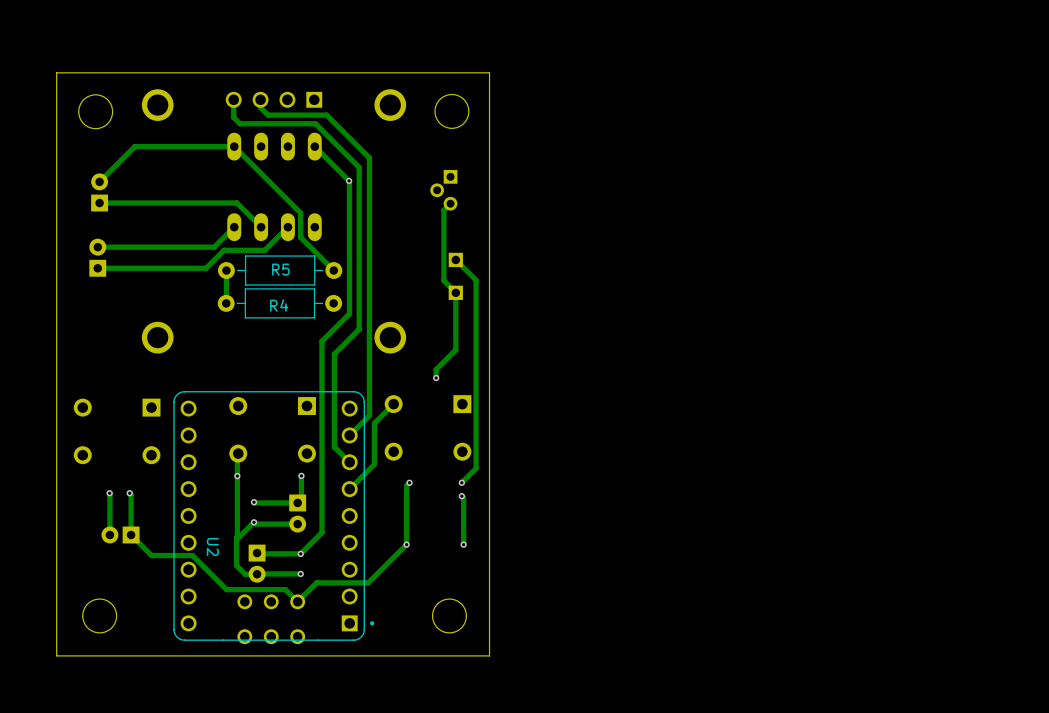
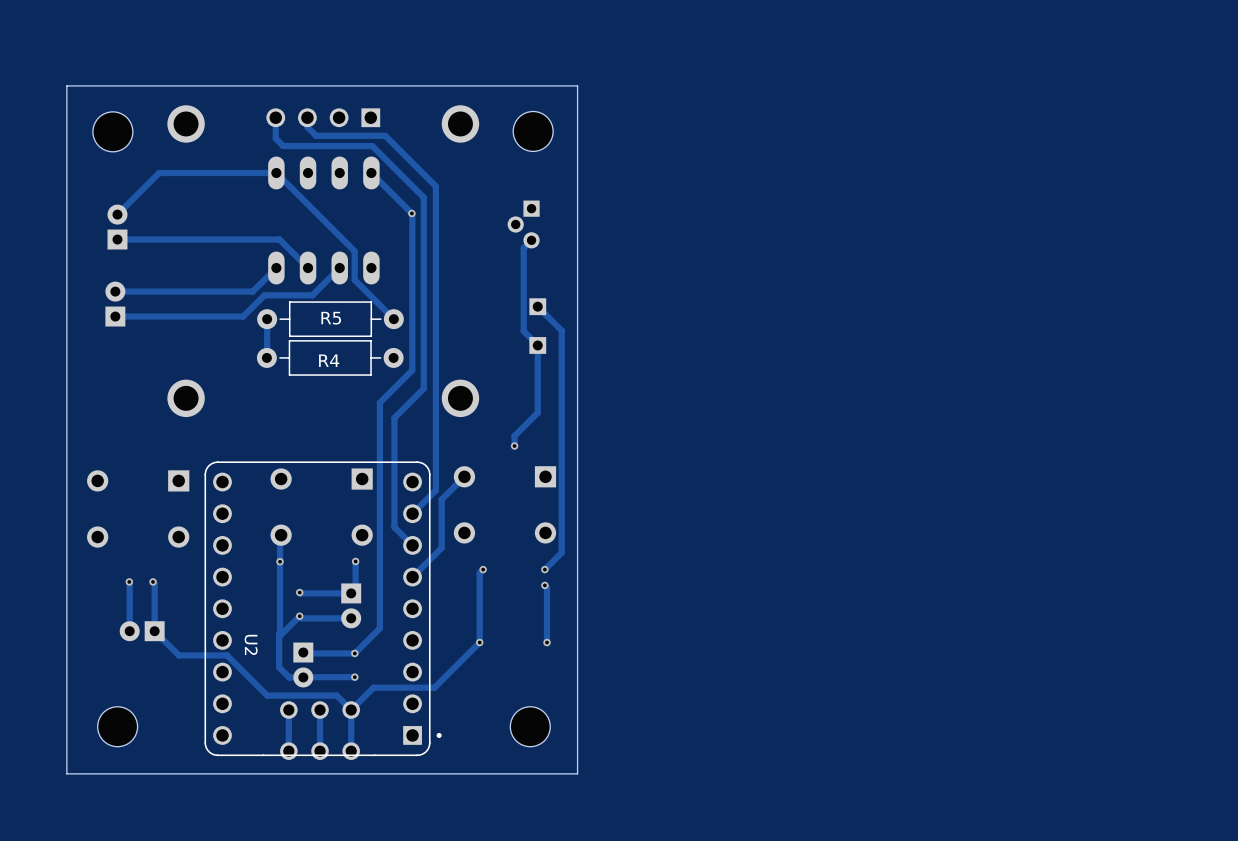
track: none -> (288, 710) (288, 751)
track: none -> (320, 710) (320, 751)
track: none -> (351, 710) (351, 751)

